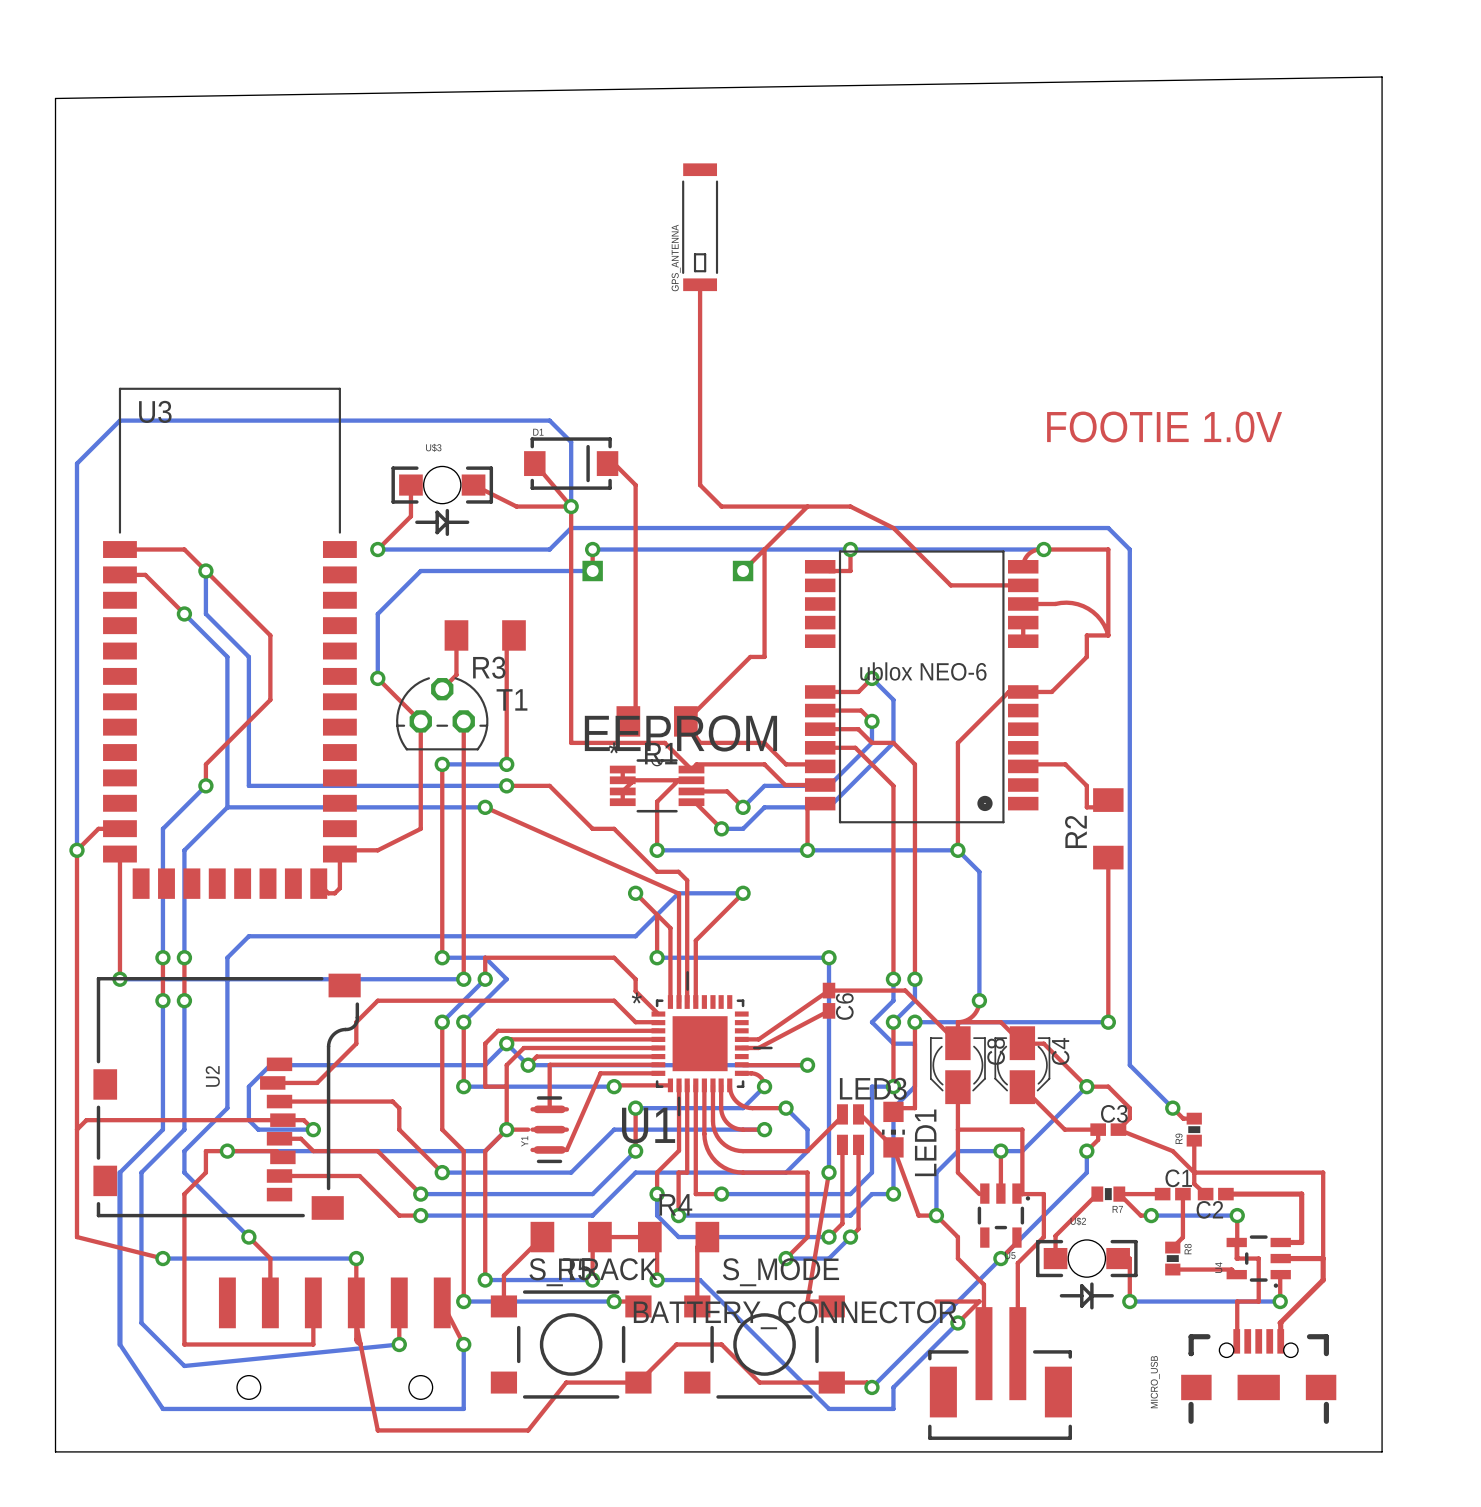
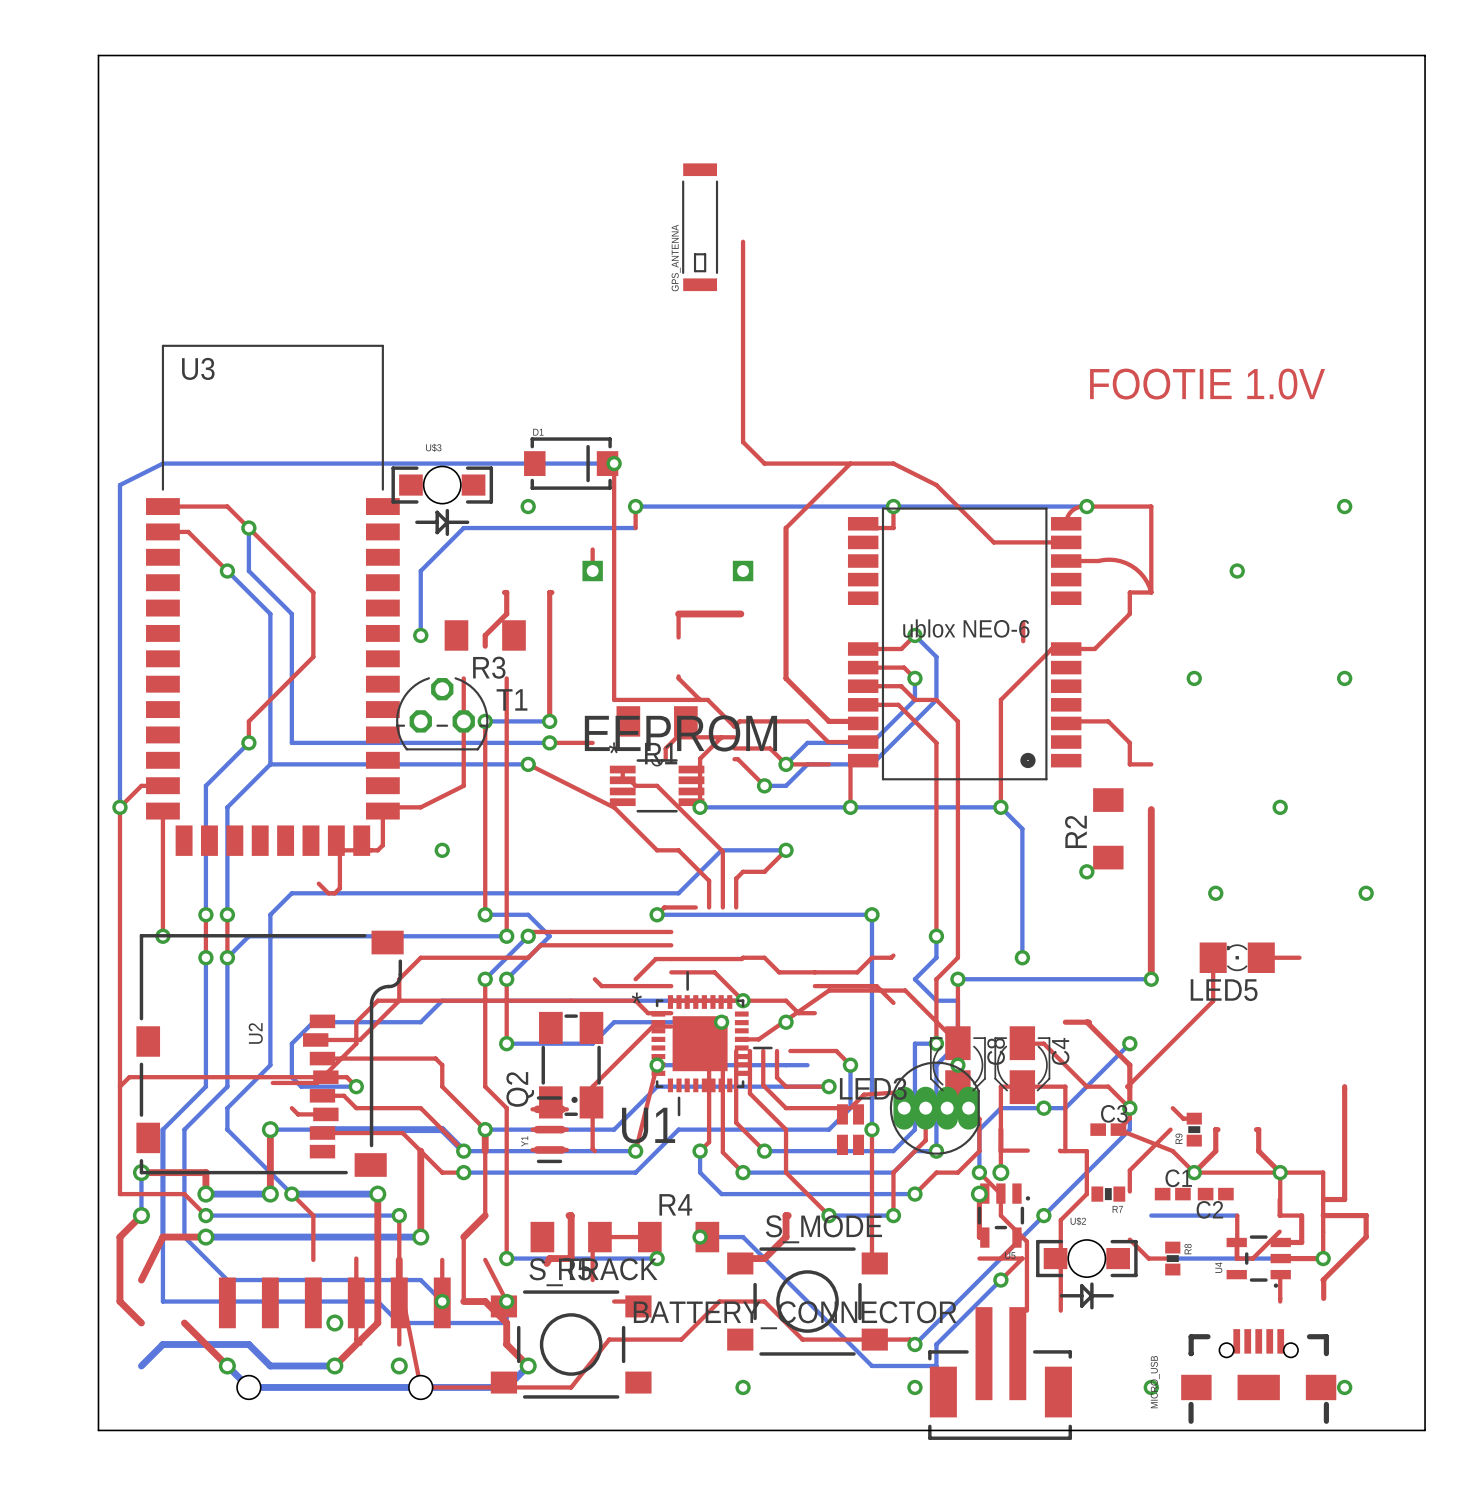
board edge: (1382, 76) (1382, 1451) (55, 1451) (55, 98) (1382, 76) -> (98, 55) (98, 1430) (1425, 1430) (1425, 55) (98, 55)
top track: (700, 284) (700, 485) (721, 506) (850, 506) (893, 528) (950, 585) (1023, 585) -> (743, 241) (743, 442) (764, 463) (893, 463) (936, 485) (993, 542) (1066, 542)
text position: FOOTIE 1.0V (1164, 427) -> FOOTIE 1.0V (1207, 384)
top track: (534, 463) (571, 506) -> none
top track: (607, 463) (614, 463) (635, 485) (635, 506) -> none
top track: none -> (614, 463) (614, 699) (707, 699) (734, 726) (739, 721) (807, 721) (828, 742) (863, 742)
bottom track: none -> (614, 463) (162, 463) (119, 485) (119, 807)
via: none -> (614, 463)
top track: none -> (850, 463) (807, 506)
top track: (410, 485) (410, 516) (377, 549) -> none
top track: (473, 485) (516, 506) (571, 506) -> none
via: none -> (528, 506)
top track: (571, 506) (571, 742) -> (549, 742) (571, 742)
bottom track: (571, 506) (571, 442) (549, 420) (119, 420) (76, 463) (76, 850) -> none
via: (571, 506) -> none
via: none -> (635, 506)
top track: none -> (893, 506) (893, 528) (871, 528)
via: none -> (893, 506)
via: none -> (1344, 506)
via: none -> (248, 528)
bottom track: (571, 528) (549, 549) (377, 549) -> (571, 528) (463, 528) (420, 571) (420, 635)
top track: (635, 528) (635, 714) (628, 721) -> none
bottom track: (635, 528) (1108, 528) (1129, 549) (1129, 1065) (1172, 1108) -> none
top track: (786, 528) (743, 571) -> (786, 528) (786, 678) (829, 721) (863, 723)
top track: (119, 549) (184, 549) (270, 635) (270, 699) -> (162, 506) (227, 506) (313, 592) (313, 656) (270, 699)
via: (377, 549) -> none
bottom track: (592, 549) (1043, 549) -> (635, 506) (1086, 506)
via: (592, 549) -> none
top track: (764, 549) (764, 656) (750, 656) (685, 721) (700, 742) (764, 742) (770, 748) -> (734, 748) (770, 748)
top track: (850, 549) (850, 571) (829, 571) (820, 566) -> none
via: (850, 549) -> none
via position: (1043, 549) -> (1086, 506)
top track: (1023, 566) (1026, 556) (1036, 550) (1108, 549) (1108, 635) -> (1066, 523) (1069, 513) (1078, 507) (1151, 506) (1151, 592)
bottom track: (205, 571) (205, 613) (248, 656) (248, 785) (506, 785) -> (248, 528) (248, 571) (291, 613) (291, 742) (549, 742)
via position: (205, 571) -> (227, 571)
bottom track: (592, 571) (420, 571) (377, 613) (377, 678) -> none
via: none -> (1237, 571)
top track: (119, 574) (145, 574) (184, 613) -> (162, 531) (188, 531) (227, 571)
top track: none -> (504, 592) (506, 592) (506, 613) (485, 635) (485, 646)
top track: none -> (551, 592) (549, 592) (549, 721)
top track: (1023, 603) (1066, 602) (1083, 606) (1101, 620) (1108, 635) -> (1066, 561) (1109, 559) (1126, 563) (1143, 577) (1151, 592)
bottom track: (184, 613) (227, 656) (227, 807) -> (227, 571) (270, 613) (270, 764)
via: (184, 613) -> none
top track: none -> (740, 613) (678, 613) (678, 637)
via: none -> (420, 635)
top track: (456, 635) (456, 674) (442, 689) -> none
top track: (513, 635) (506, 635) (506, 678) -> none
via: none -> (914, 635)
top track: (1108, 635) (1086, 635) (1086, 656) (1051, 691) (1008, 691) -> (1151, 592) (1129, 592) (1129, 613) (1094, 648) (1051, 648) (1008, 691)
U3 position: (229, 643) -> (272, 600)
top track: none -> (678, 676) (700, 699)
top track: (377, 678) (420, 721) (420, 828) (377, 850) -> (463, 785) (420, 807) (386, 807) (382, 811) (382, 845) (377, 850)
via: (377, 678) -> none
top track: none -> (463, 678) (463, 721)
top track: (871, 678) (858, 691) (820, 691) -> (914, 635) (901, 648) (863, 648)
bottom track: (871, 678) (893, 699) (893, 742) -> (914, 635) (936, 656) (936, 699) (893, 742)
via: (871, 678) -> none
bottom track: none -> (914, 678) (914, 699) (871, 742) (807, 742) (786, 764)
via: none -> (914, 678)
via: none -> (1194, 678)
via: none -> (1344, 678)
top track: none -> (863, 686) (901, 686) (914, 699) (936, 699) (957, 721) (957, 742)
part position: (921, 686) -> (964, 643)
top track: (1000, 699) (957, 742) -> (1000, 699) (1000, 807)
top track: (820, 710) (861, 710) (871, 721) -> (863, 667) (904, 667) (914, 678)
top track: (248, 721) (205, 764) (205, 785) -> (248, 721) (248, 742)
via: none -> (485, 721)
via: none -> (549, 721)
bottom track: (871, 721) (871, 742) (829, 785) (786, 785) -> (871, 764) (807, 764) (786, 785)
via: (871, 721) -> none
top track: none -> (1066, 723) (1065, 721) (1108, 721) (1129, 742) (1129, 764) (1151, 764)
top track: (820, 729) (858, 729) (871, 742) (893, 742) (914, 764) (914, 979) -> none
via: none -> (248, 742)
via: none -> (549, 742)
top track: (592, 742) (664, 742) (691, 769) (696, 764) (764, 764) (785, 785) (820, 785) -> none
top track: (820, 747) (855, 747) (893, 785) (893, 979) -> (863, 704) (898, 704) (936, 742) (936, 936)
bottom track: none -> (270, 764) (442, 764)
top track: (442, 764) (442, 957) -> (485, 721) (485, 914)
via: (442, 764) -> none
top track: none -> (506, 764) (506, 936)
via: (506, 764) -> none
top track: none -> (528, 764) (614, 807) (657, 850) (678, 850) (709, 880) (709, 907)
via: none -> (528, 764)
via: none -> (786, 764)
bottom track: (871, 764) (829, 807) -> (1022, 957) (1022, 828) (1000, 807) (829, 807)
top track: (1023, 766) (1022, 764) (1065, 764) (1086, 785) (1086, 807) (1108, 807) (1108, 800) -> none
top track: (678, 780) (657, 801) (657, 850) -> (721, 737) (700, 758) (700, 807)
top track: (691, 780) (633, 780) (622, 791) (622, 802) -> (734, 737) (676, 737) (665, 748) (665, 759)
top track: none -> (631, 782) (635, 785) (657, 785) (722, 851) (722, 907)
top track: none -> (162, 785) (141, 785) (119, 807) (119, 850)
bottom track: (205, 785) (162, 828) (162, 957) -> (248, 742) (205, 785) (205, 914)
via: (205, 785) -> none
top track: (463, 785) (463, 979) -> none
top track: (506, 785) (549, 785) (592, 828) (614, 828) (657, 871) (678, 871) (687, 880) (687, 1002) -> none
via: (506, 785) -> none
bottom track: (764, 785) (743, 807) -> none
via: none -> (764, 785)
top track: (691, 791) (727, 791) (743, 807) -> none
top track: (691, 802) (694, 802) (721, 828) -> (734, 759) (737, 759) (764, 785)
top track: (820, 803) (807, 807) (807, 850) -> (863, 760) (850, 764) (850, 807)
via: none -> (119, 807)
top track: none -> (162, 807) (162, 936)
bottom track: (227, 807) (184, 850) (184, 957) -> (270, 764) (227, 807) (227, 914)
bottom track: (227, 807) (485, 807) -> none
top track: (485, 807) (679, 893) (679, 1002) -> none
via: (485, 807) -> none
via: none -> (700, 807)
via: (743, 807) -> none
bottom track: (764, 807) (743, 828) (721, 828) -> (764, 807) (700, 807)
via: none -> (850, 807)
via: none -> (1000, 807)
via: none -> (1280, 807)
top track: none -> (1151, 809) (1151, 979)
top track: (119, 828) (98, 828) (76, 850) (76, 1237) (162, 1258) -> none
via: (721, 828) -> none
via: (76, 850) -> none
via: none -> (442, 850)
bottom track: (657, 850) (721, 850) -> (485, 721) (549, 721)
via: (657, 850) -> none
top track: none -> (786, 850) (764, 871) (743, 871) (736, 878) (736, 907)
bottom track: (786, 850) (957, 850) (979, 871) (979, 1000) -> none
via position: (807, 850) -> (786, 850)
top track: none -> (957, 850) (957, 957) (936, 979) (936, 1043)
via: (957, 850) -> none
top track: (1108, 850) (1108, 1022) -> none
via: none -> (1086, 871)
top track: (635, 893) (670, 928) (670, 1002) -> none
via: (635, 893) -> none
top track: (743, 893) (695, 940) (695, 1002) -> none
bottom track: (743, 893) (678, 893) (635, 936) (506, 936) -> none
via: (743, 893) -> none
via: none -> (1215, 893)
via: none -> (1366, 893)
via: none -> (205, 914)
via: none -> (227, 914)
via: none -> (485, 914)
top track: (657, 914) (657, 957) -> (657, 914) (664, 907) (695, 907)
via: none -> (657, 914)
via: none -> (871, 914)
top track: none -> (671, 931) (532, 931) (528, 936)
via: none -> (162, 936)
via: none -> (506, 936)
via: none -> (528, 936)
via: none -> (936, 936)
top track: none -> (893, 955) (891, 957) (871, 957) (857, 972) (779, 972) (764, 957) (655, 959) (635, 979)
top track: (162, 957) (162, 1000) -> (205, 914) (205, 957)
via: (162, 957) -> none
top track: (184, 957) (184, 1000) -> (227, 914) (227, 957)
via: (184, 957) -> none
bottom track: none -> (205, 957) (205, 1086) (162, 1129) (162, 1301) (377, 1301) (399, 1323) (506, 1323) (506, 1301)
via: none -> (205, 957)
via: none -> (227, 957)
bottom track: (442, 957) (485, 957) (506, 979) (463, 1022) -> (485, 914) (528, 914) (549, 936) (506, 979)
via: (442, 957) -> none
top track: (485, 957) (485, 979) -> (485, 1043) (485, 979)
top track: none -> (485, 957) (420, 957) (399, 979) (399, 1000) (360, 1039) (315, 1039)
top track: (528, 957) (614, 957) (635, 979) (635, 991) (658, 1014) -> (528, 957) (540, 945) (671, 945)
bottom track: (657, 957) (829, 957) (829, 1172) -> none
via: (657, 957) -> none
via: (829, 957) -> none
via: none -> (1022, 957)
top track: none -> (1213, 957) (1213, 1001) (1127, 1086) (1129, 1086)
LED5: none -> (1237, 957)
top track: none -> (1299, 957) (1261, 957) (1261, 960)
top track: none -> (671, 972) (714, 972) (743, 1000)
top track: none -> (119, 979) (119, 1194) (184, 1194) (205, 1215)
bottom track: (119, 979) (463, 979) -> none
via: (119, 979) -> none
via: (463, 979) -> none
bottom track: (485, 979) (442, 1022) -> (485, 979) (528, 936)
via: none -> (506, 979)
top track: none -> (594, 979) (601, 986) (671, 986)
bottom track: (893, 979) (893, 1000) (871, 1022) (893, 1043) (914, 1043) -> (936, 1043) (914, 1043)
via: (893, 979) -> none
bottom track: (914, 979) (914, 1000) (893, 1022) -> none
via: (914, 979) -> none
via: none -> (957, 979)
via: none -> (1151, 979)
top track: none -> (814, 986) (876, 986) (893, 1002)
top track: none -> (671, 999) (786, 1000) (798, 1013) (814, 1013)
bottom track: (162, 1000) (162, 1129) (119, 1172) (119, 1344) (162, 1408) (463, 1408) (463, 1344) -> none
via: (162, 1000) -> none
bottom track: (184, 1000) (184, 1129) (141, 1172) -> none
via: (184, 1000) -> none
top track: (614, 1000) (635, 1022) (658, 1022) -> (614, 1000) (635, 1000) (648, 1013) (671, 1013)
bottom track: none -> (743, 1000) (442, 1000) (420, 1022) (313, 1022) (291, 1043) (291, 1077) (301, 1086) (356, 1086)
via: none -> (743, 1000)
C6: (829, 1000) -> none
top track: (979, 1000) (977, 1008) (973, 1015) (966, 1020) (957, 1022) (1000, 1022) (1022, 1043) -> none
via: (979, 1000) -> none
top track: (829, 1010) (758, 1047) (741, 1047) -> none
top track: (442, 1022) (442, 1065) -> (322, 1058) (435, 1058) (442, 1065)
via: (442, 1022) -> none
top track: (463, 1022) (463, 1086) -> (270, 1129) (270, 1194)
via: (463, 1022) -> none
bottom track: none -> (721, 1022) (614, 1022) (592, 1043) (506, 1043)
via: none -> (721, 1022)
via: none -> (786, 1022)
top track: (893, 1022) (893, 1086) -> none
via: (893, 1022) -> none
top track: (914, 1022) (914, 1108) (893, 1108) (893, 1111) -> none
bottom track: (914, 1022) (1108, 1022) -> (957, 979) (1151, 979)
via: (914, 1022) -> none
top track: none -> (1065, 1022) (1089, 1022)
top track: none -> (1086, 1022) (1129, 1065) (1129, 1108)
via: (1108, 1022) -> none
top track: none -> (671, 1026) (652, 1026) (592, 1086) (592, 1148) (594, 1151)
top track: (658, 1030) (498, 1030) (485, 1043) -> none
top track: (658, 1039) (511, 1039) (506, 1043) -> (506, 979) (506, 1043)
via: none -> (936, 1043)
bottom track: none -> (1129, 1043) (1086, 1086)
via: none -> (1129, 1043)
top track: (658, 1047) (523, 1047) (506, 1065) (506, 1108) -> none
top track: none -> (709, 1051) (709, 1142) (700, 1151)
top track: none -> (722, 1051) (722, 1152) (743, 1172)
top track: none -> (736, 1051) (736, 1122) (764, 1151)
top track: none -> (749, 1051) (749, 1093) (786, 1129) (786, 1172) (829, 1215)
top track: none -> (763, 1051) (763, 1085) (786, 1108) (850, 1108) (863, 1094) (904, 1091) (904, 1108)
top track: none -> (777, 1051) (777, 1077) (786, 1086) (829, 1086)
top track: none -> (790, 1051) (836, 1051) (850, 1065)
top track: (658, 1056) (536, 1056) (528, 1065) -> none
top track: (658, 1064) (550, 1064) (549, 1109) -> none
bottom track: (270, 1065) (485, 1065) (506, 1043) (528, 1065) (657, 1065) -> (270, 1065) (270, 914) (291, 893) (678, 893) (721, 850)
via: (528, 1065) -> none
Q2: none -> (571, 1065)
via: none -> (657, 1065)
top track: (743, 1065) (807, 1065) -> none
via: (807, 1065) -> none
bottom track: none -> (850, 1065) (850, 1108) (829, 1129) (764, 1129)
via: none -> (850, 1065)
via: none -> (957, 1065)
top track: (658, 1073) (600, 1073) (566, 1149) -> none
top track: (741, 1073) (757, 1075) (762, 1080) (764, 1086) -> none
top track: (670, 1085) (614, 1086) -> none
top track: (679, 1085) (679, 1150) (657, 1172) (657, 1194) -> none
top track: (687, 1085) (687, 1172) (678, 1172) (678, 1215) -> none
top track: (695, 1085) (695, 1194) (721, 1194) -> none
top track: (704, 1085) (704, 1138) (709, 1153) (719, 1164) (738, 1172) (807, 1172) (807, 1237) (786, 1258) -> none
top track: (712, 1085) (712, 1121) (715, 1132) (721, 1142) (735, 1150) (807, 1151) (842, 1114) -> none
top track: (721, 1085) (721, 1110) (727, 1123) (740, 1129) (764, 1129) -> none
top track: (729, 1085) (734, 1099) (743, 1106) (786, 1108) -> none
bottom track: (227, 1086) (227, 1108) (184, 1151) -> (227, 1086) (184, 1129) (184, 1151)
bottom track: (248, 1086) (248, 1120) (258, 1129) (270, 1129) -> (248, 1086) (227, 1108) (227, 1129) (291, 1194) (377, 1194)
via: none -> (356, 1086)
top track: (442, 1086) (442, 1129) -> (442, 1086) (485, 1129) (485, 1151)
bottom track: (463, 1086) (614, 1086) -> none
via: (463, 1086) -> none
top track: (485, 1086) (506, 1086) -> (485, 1086) (506, 1108)
via: (614, 1086) -> none
bottom track: (764, 1086) (743, 1108) (635, 1108) -> none
via: (764, 1086) -> none
bottom track: none -> (829, 1086) (657, 1086) (614, 1129) (485, 1129)
via: none -> (829, 1086)
bottom track: (871, 1086) (893, 1086) -> (871, 1086) (871, 914) (657, 914)
via: (893, 1086) -> none
bottom track: (914, 1086) (893, 1108) (893, 1194) -> (914, 1194) (893, 1194)
bottom track: none -> (914, 1086) (914, 1129) (893, 1151) (764, 1151)
via: (1086, 1086) -> none
top track: none -> (1344, 1086) (1344, 1199) (1323, 1199)
top track: (957, 1087) (957, 1172) (979, 1194) -> (981, 1237) (979, 1237) (979, 1194)
top track: (1022, 1087) (1064, 1129) (1098, 1129) (1098, 1139) (1086, 1151) -> none
top track: none -> (322, 1095) (343, 1095) (356, 1108) (420, 1108) (442, 1129)
U2 position: (227, 1096) -> (270, 1053)
top track: (279, 1101) (392, 1101) (399, 1108) (399, 1129) (402, 1133) -> (322, 1133) (402, 1133)
top track: none -> (291, 1108) (298, 1114) (325, 1114)
top track: (635, 1108) (635, 1151) -> (657, 1065) (635, 1151)
via: (635, 1108) -> none
bottom track: (786, 1108) (807, 1129) (807, 1151) (786, 1172) -> (936, 936) (936, 957) (914, 979) (936, 1000) (957, 1000) (957, 1043) (936, 1065) (936, 1151) (914, 1151) (893, 1172) (786, 1172)
via: (786, 1108) -> none
top track: none -> (925, 1108) (925, 1140) (893, 1172) (893, 1215)
part: none -> (934, 1108)
top track: none -> (968, 1108) (979, 1118) (979, 1151) (957, 1172) (936, 1172) (914, 1194)
via: none -> (1043, 1108)
bottom track: (1065, 1108) (1022, 1151) (957, 1151) (936, 1172) (936, 1215) -> (1065, 1108) (1000, 1108) (979, 1129) (979, 1172)
via: none -> (1129, 1108)
via: (1172, 1108) -> none
top track: (858, 1114) (893, 1147) (918, 1215) (936, 1215) (957, 1237) (957, 1258) (983, 1284) (983, 1353) -> none
top track: (76, 1129) (86, 1120) (303, 1120) (313, 1129) -> (119, 1086) (129, 1077) (346, 1077) (356, 1086)
via: none -> (270, 1129)
via: (313, 1129) -> none
top track: none -> (506, 1129) (506, 1258)
via position: (506, 1129) -> (485, 1129)
top track: (528, 1129) (506, 1129) (485, 1151) -> none
bottom track: (678, 1129) (614, 1129) (571, 1172) -> (678, 1129) (635, 1172) (571, 1172)
via position: (764, 1129) -> (764, 1151)
top track: none -> (871, 1129) (871, 1258) (874, 1263)
bottom track: (871, 1129) (871, 1172) (850, 1194) -> none
via: none -> (871, 1129)
LED1: (893, 1129) -> none
top track: (957, 1129) (1022, 1129) (1022, 1194) -> none
top track: none -> (1170, 1129) (1129, 1170) (1129, 1191)
top track: none -> (1217, 1129) (1215, 1129) (1215, 1151) (1194, 1172)
top track: none -> (1256, 1129) (1258, 1129) (1258, 1151) (1280, 1172) (1280, 1215)
top track: (279, 1138) (300, 1138) (313, 1151) (377, 1151) (420, 1194) -> none
top track: (1194, 1140) (1194, 1183) (1205, 1194) -> none
top track: (842, 1144) (842, 1223) (829, 1237) -> none
top track: (858, 1144) (858, 1229) (850, 1237) -> none
top track: none -> (1027, 1150) (1000, 1151) (1000, 1086) (1065, 1086) (1065, 1151)
top track: none -> (1059, 1150) (1086, 1151) (1086, 1194) (1060, 1220) (1060, 1310)
bottom track: (227, 1151) (463, 1151) -> (313, 1129) (442, 1129) (463, 1151)
via: (227, 1151) -> none
top track: (463, 1151) (463, 1237) -> (420, 1151) (420, 1237)
via: none -> (463, 1151)
bottom track: (635, 1151) (592, 1194) (420, 1194) -> (635, 1151) (485, 1151)
bottom track: none -> (700, 1151) (700, 1172) (721, 1194)
via: none -> (700, 1151)
via: none -> (936, 1151)
via: (1000, 1151) -> none
bottom track: (1086, 1151) (1086, 1172) -> (1129, 1108) (1129, 1129) (1086, 1172)
via: (1086, 1151) -> none
top track: (282, 1157) (276, 1151) (205, 1151) (205, 1172) (184, 1194) (184, 1344) (313, 1344) (313, 1302) -> none
top track: none -> (141, 1172) (205, 1172) (205, 1194)
via: none -> (141, 1172)
bottom track: (184, 1172) (248, 1237) -> (184, 1172) (184, 1237) (227, 1280) (420, 1280) (442, 1301)
top track: none -> (442, 1172) (463, 1172)
bottom track: (442, 1172) (463, 1172) -> (506, 764) (528, 764)
via: (442, 1172) -> none
via: none -> (463, 1172)
bottom track: (743, 1172) (635, 1172) (592, 1215) (420, 1215) -> none
via: none -> (743, 1172)
top track: (829, 1172) (807, 1301) (829, 1301) (831, 1306) -> none
via: (829, 1172) -> none
top track: none -> (979, 1172) (1000, 1194) (1000, 1215) (1026, 1241) (1026, 1310)
via: none -> (979, 1172)
top track: (1000, 1172) (1000, 1194) -> none
via: none -> (1000, 1172)
via: none -> (1194, 1172)
via: none -> (1280, 1172)
top track: (279, 1175) (359, 1175) (399, 1215) (420, 1215) -> none
top track: (1016, 1193) (1043, 1194) (1043, 1237) (1022, 1258) -> (979, 1258) (1022, 1258)
bottom track: none -> (205, 1194) (270, 1194)
via: none -> (205, 1194)
via: none -> (270, 1194)
via: none -> (291, 1194)
top track: none -> (377, 1194) (377, 1323) (334, 1365)
via: none -> (377, 1194)
via: (420, 1194) -> none
bottom track: (657, 1194) (657, 1215) (678, 1237) (700, 1237) -> none
via: (657, 1194) -> none
via: (721, 1194) -> none
bottom track: (871, 1194) (850, 1215) -> (871, 1194) (850, 1194)
via: (893, 1194) -> none
via: none -> (914, 1194)
via: none -> (979, 1194)
top track: (1097, 1194) (1055, 1235) (1055, 1258) -> none
top track: (1162, 1194) (1119, 1194) (1140, 1215) (1151, 1215) -> none
top track: (1182, 1194) (1182, 1237) (1172, 1247) -> none
top track: (1225, 1194) (1301, 1194) (1301, 1215) -> (1279, 1199) (1279, 1215) (1301, 1215)
top track: none -> (141, 1215) (119, 1237) (119, 1301) (141, 1323)
bottom track: (141, 1215) (141, 1323) (184, 1365) (399, 1344) -> none
via: none -> (141, 1215)
via: none -> (205, 1215)
top track: none -> (399, 1215) (399, 1302)
via: none -> (399, 1215)
via: (420, 1215) -> none
top track: (485, 1215) (485, 1280) -> (485, 1215) (463, 1237)
top track: none -> (568, 1215) (571, 1215) (571, 1258) (549, 1258) (546, 1263)
bottom track: (678, 1215) (829, 1215) -> none
via: (678, 1215) -> none
top track: none -> (788, 1215) (786, 1215) (786, 1237) (764, 1258) (743, 1258) (740, 1263)
via: none -> (829, 1215)
bottom track: none -> (850, 1215) (893, 1215)
via: none -> (893, 1215)
via: (936, 1215) -> none
via: none -> (1043, 1215)
via: (1151, 1215) -> none
via: (1237, 1215) -> none
top track: none -> (1366, 1215) (1323, 1215) (1366, 1215)
top track: none -> (1366, 1215) (1366, 1237) (1323, 1280) (1323, 1298)
top track: none -> (205, 1237) (162, 1237) (141, 1280)
bottom track: none -> (205, 1237) (420, 1237)
via: none -> (205, 1237)
top track: (248, 1237) (270, 1258) (270, 1302) -> (291, 1194) (313, 1215) (313, 1259)
via: (248, 1237) -> none
via: none -> (420, 1237)
top track: (542, 1237) (503, 1275) (503, 1306) -> none
top track: (657, 1237) (657, 1280) -> (957, 979) (957, 1022)
via: none -> (700, 1237)
top track: (707, 1237) (697, 1247) (697, 1306) -> none
bottom track: (743, 1237) (829, 1237) -> none
via: (829, 1237) -> none
bottom track: (850, 1237) (829, 1258) (786, 1258) -> none
via: (850, 1237) -> none
top track: none -> (1129, 1239) (1148, 1258) (1172, 1258)
bottom track: (162, 1258) (356, 1258) -> (205, 1215) (399, 1215)
via: (162, 1258) -> none
via: (356, 1258) -> none
via: none -> (506, 1258)
via: (786, 1258) -> none
via position: (1000, 1258) -> (1000, 1280)
top track: (1118, 1258) (1129, 1258) (1129, 1301) -> none
top track: (1252, 1258) (1258, 1258) (1258, 1301) (1237, 1301) (1236, 1341) -> (1252, 1258) (1279, 1231)
top track: (1301, 1258) (1323, 1258) (1323, 1280) (1280, 1323) (1280, 1341) -> none
via: none -> (1323, 1258)
top track: none -> (442, 1259) (442, 1301)
top track: (1017, 1263) (1017, 1353) -> (1017, 1263) (1000, 1280)
top track: (1172, 1269) (1231, 1269) (1236, 1274) -> none
bottom track: (485, 1280) (592, 1280) -> none
via: (485, 1280) -> none
via: (592, 1280) -> none
bottom track: (657, 1280) (700, 1280) (829, 1408) (893, 1408) (893, 1387) (936, 1344) -> (743, 1237) (871, 1365) (936, 1365) (936, 1344)
via position: (657, 1280) -> (657, 1258)
top track: none -> (403, 1300) (402, 1300) (402, 1300) (401, 1300) (400, 1299) (399, 1297) (399, 1280) (420, 1387) (571, 1387) (609, 1339) (681, 1339) (719, 1301) (764, 1301) (802, 1339) (910, 1339) (914, 1344)
via: none -> (442, 1301)
top track: none -> (463, 1301) (485, 1301) (506, 1323) (506, 1344) (528, 1365)
bottom track: (463, 1301) (614, 1301) -> (506, 1258) (657, 1258)
via: (463, 1301) -> none
via: none -> (506, 1301)
via: (614, 1301) -> none
top track: (936, 1301) (979, 1301) (957, 1323) -> none
bottom track: (1129, 1301) (1280, 1301) -> (1172, 1258) (1323, 1258)
via: (1129, 1301) -> none
via: (1280, 1301) -> none
top track: (442, 1302) (463, 1344) -> (485, 1259) (506, 1301)
top track: none -> (184, 1323) (227, 1365)
via: none -> (334, 1323)
top track: (356, 1323) (377, 1430) (528, 1430) (566, 1382) (638, 1382) (676, 1344) (721, 1344) (759, 1382) (867, 1382) (871, 1387) -> none
via: (957, 1323) -> none
via: (399, 1344) -> none
via: (463, 1344) -> none
S_MODE position: (764, 1344) -> (807, 1301)
bottom track: (914, 1344) (871, 1387) -> (1000, 1280) (957, 1323)
via: none -> (914, 1344)
bottom track: none -> (141, 1365) (162, 1344) (248, 1344) (270, 1365) (334, 1365)
bottom track: none -> (227, 1365) (248, 1387) (506, 1387) (528, 1365)
via: none -> (227, 1365)
via: none -> (334, 1365)
via: none -> (399, 1365)
via: none -> (528, 1365)
via: none -> (743, 1387)
via: (871, 1387) -> none
via: none -> (914, 1387)
via: none -> (1151, 1387)
via: none -> (1344, 1387)

